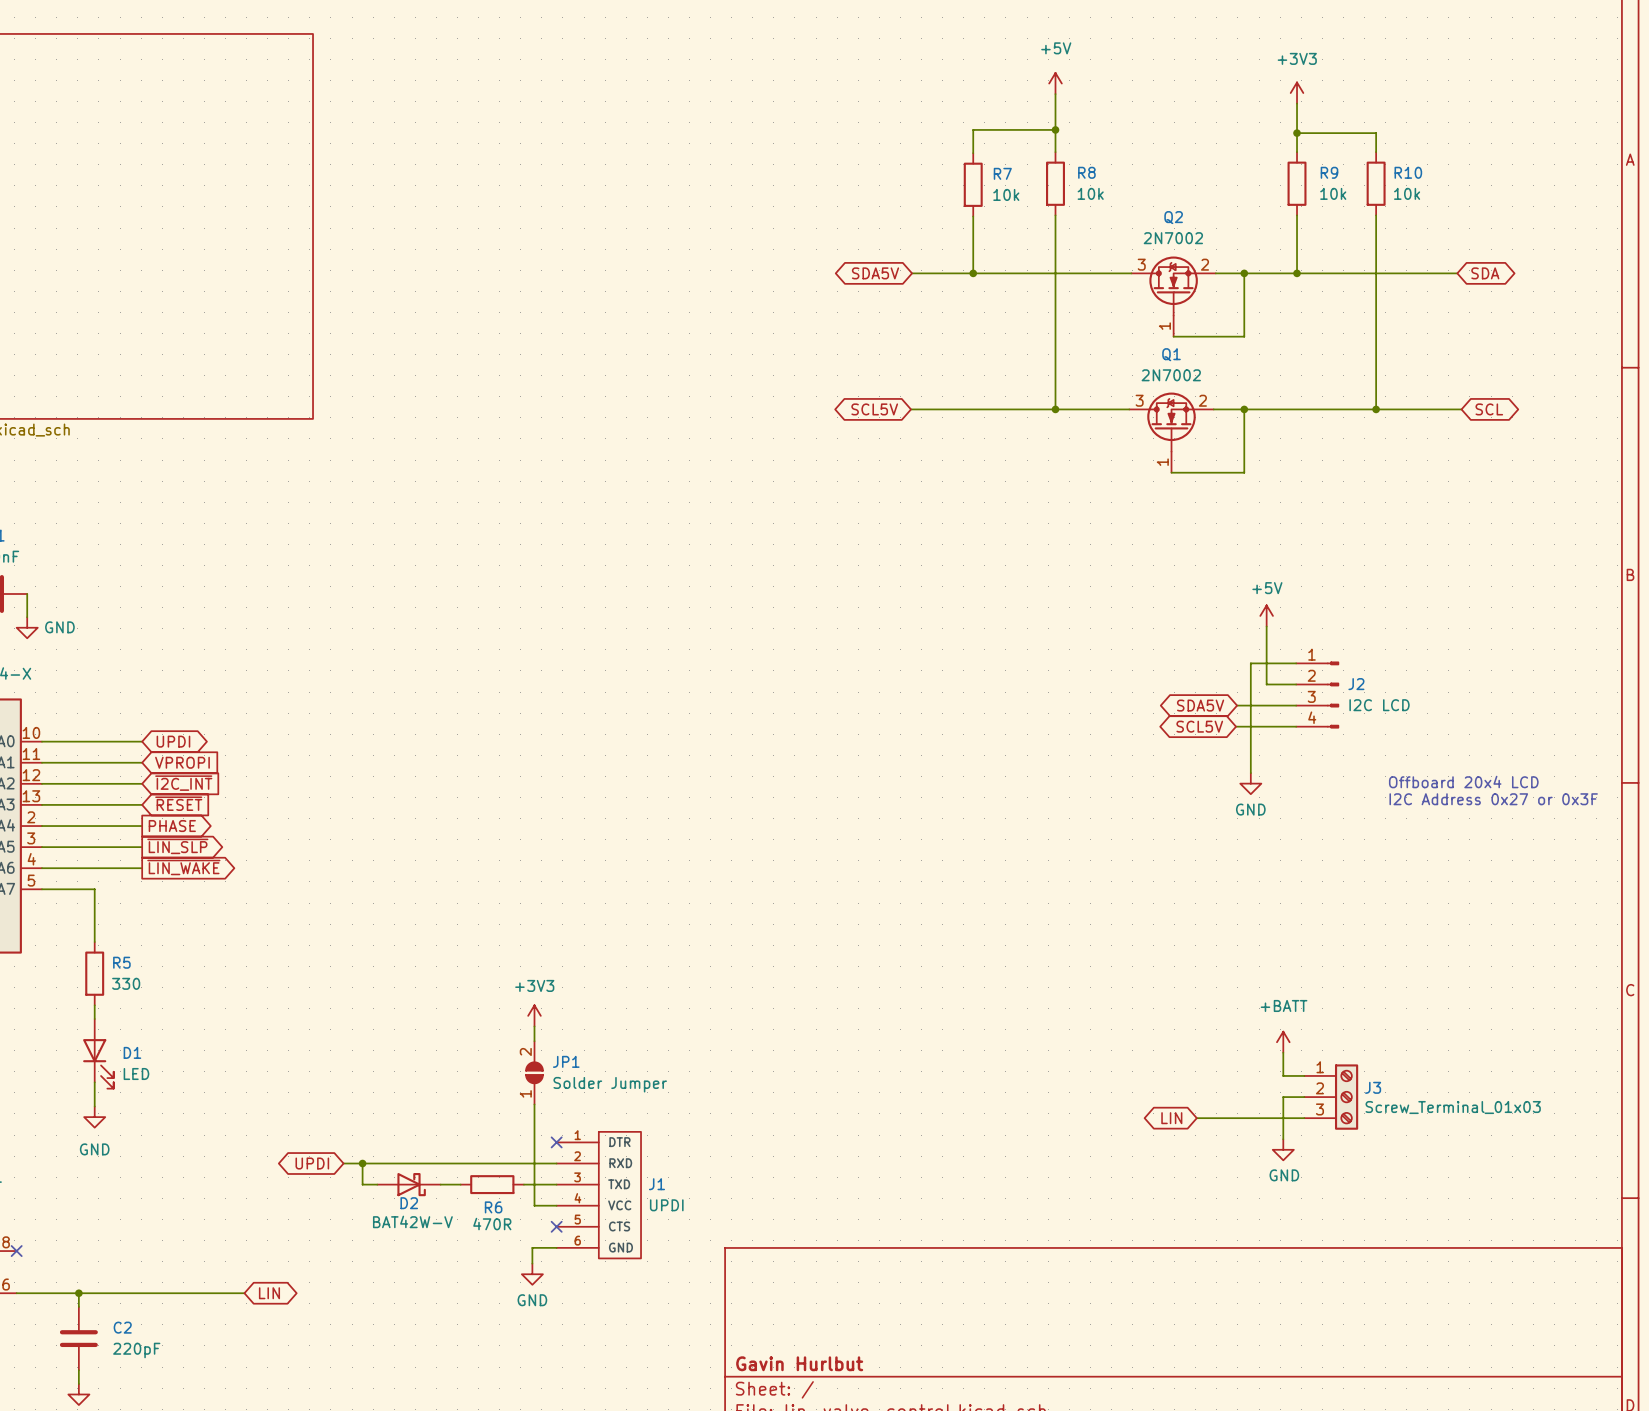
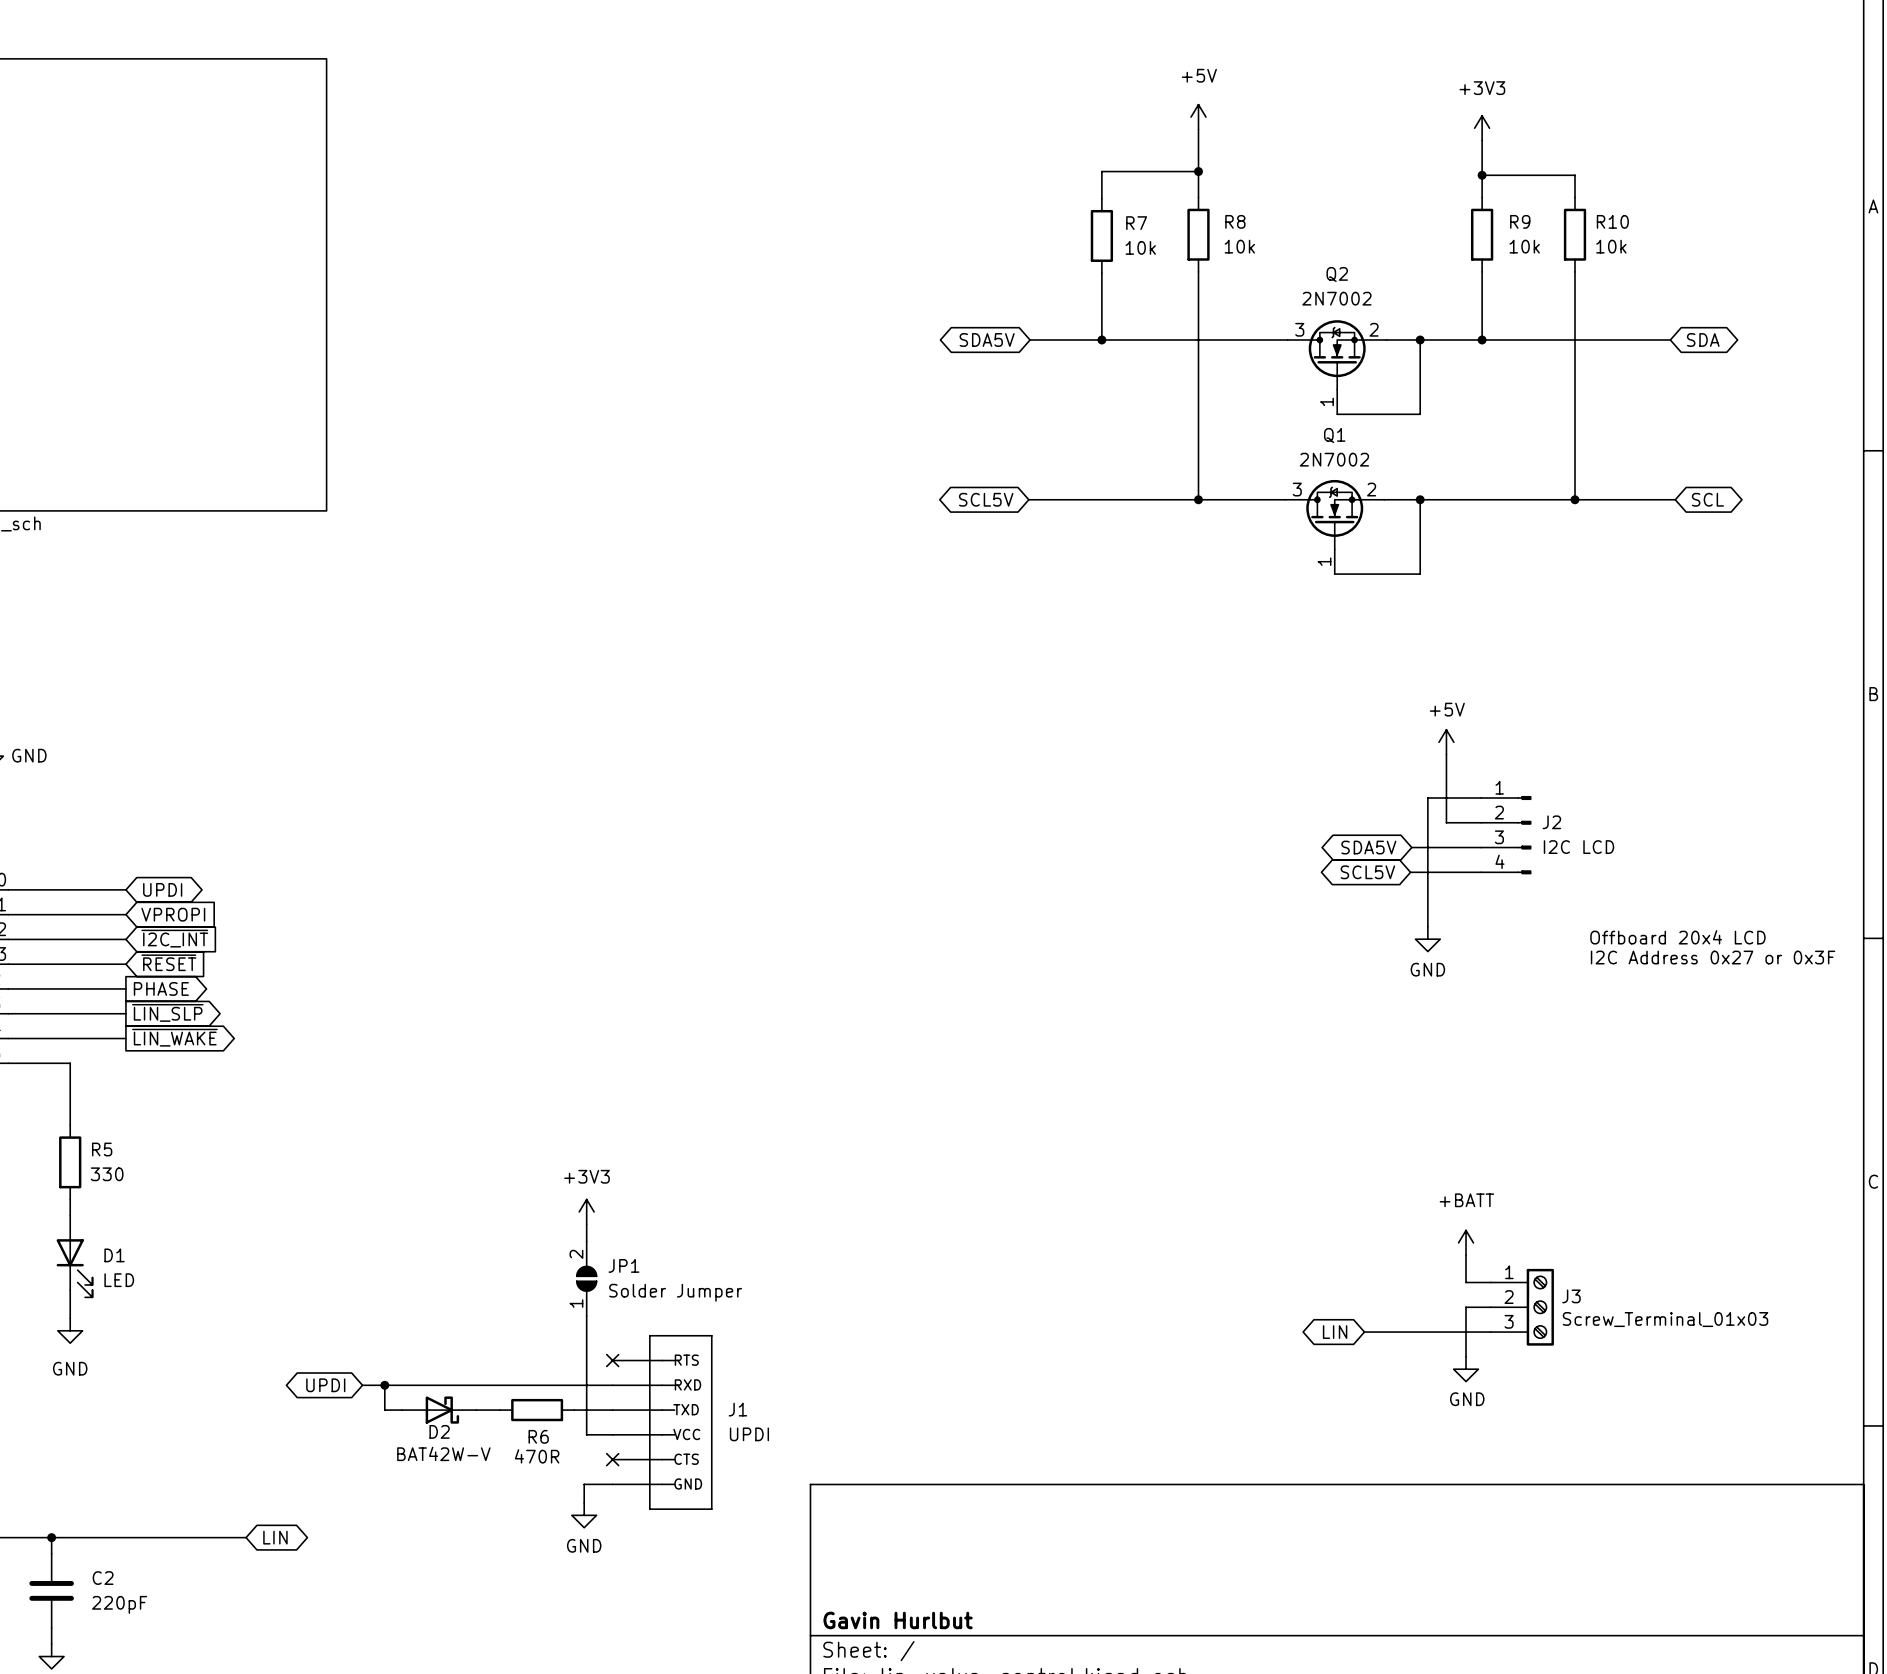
J1 symbol: [556, 1131, 642, 1259] -> [612, 1335, 712, 1510]

